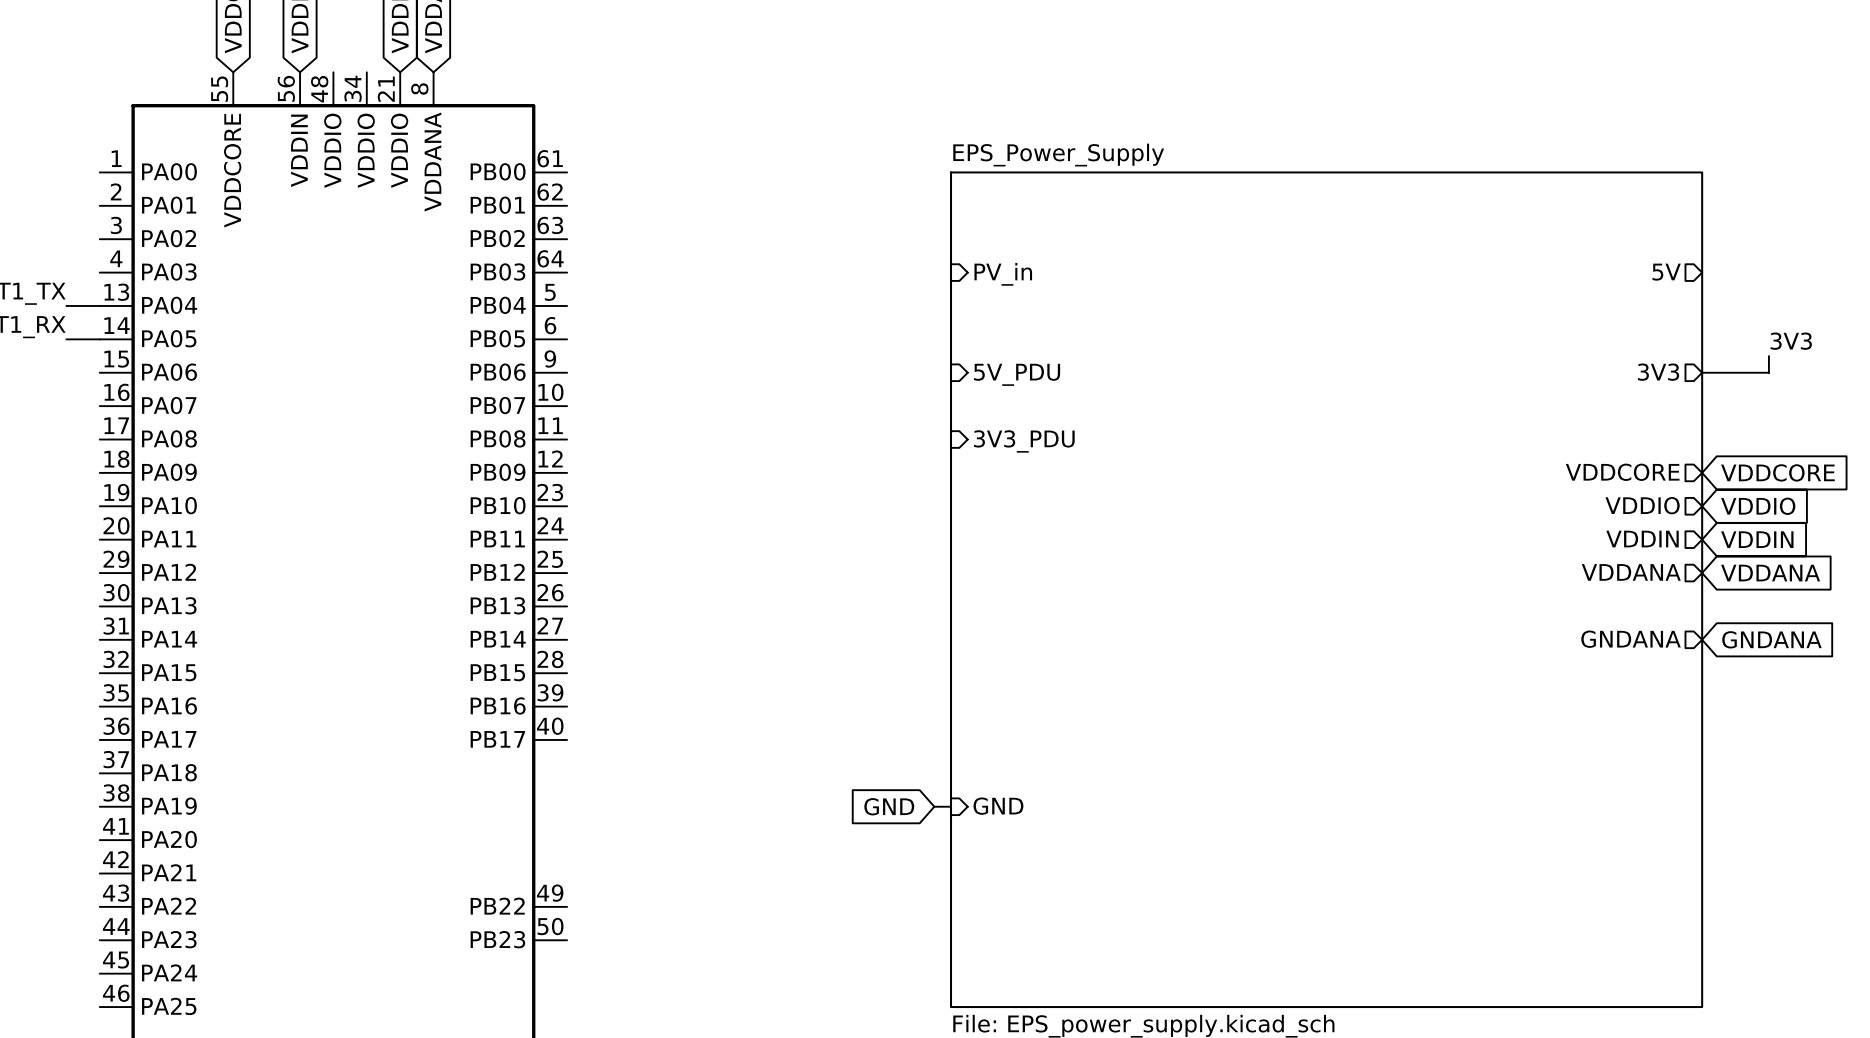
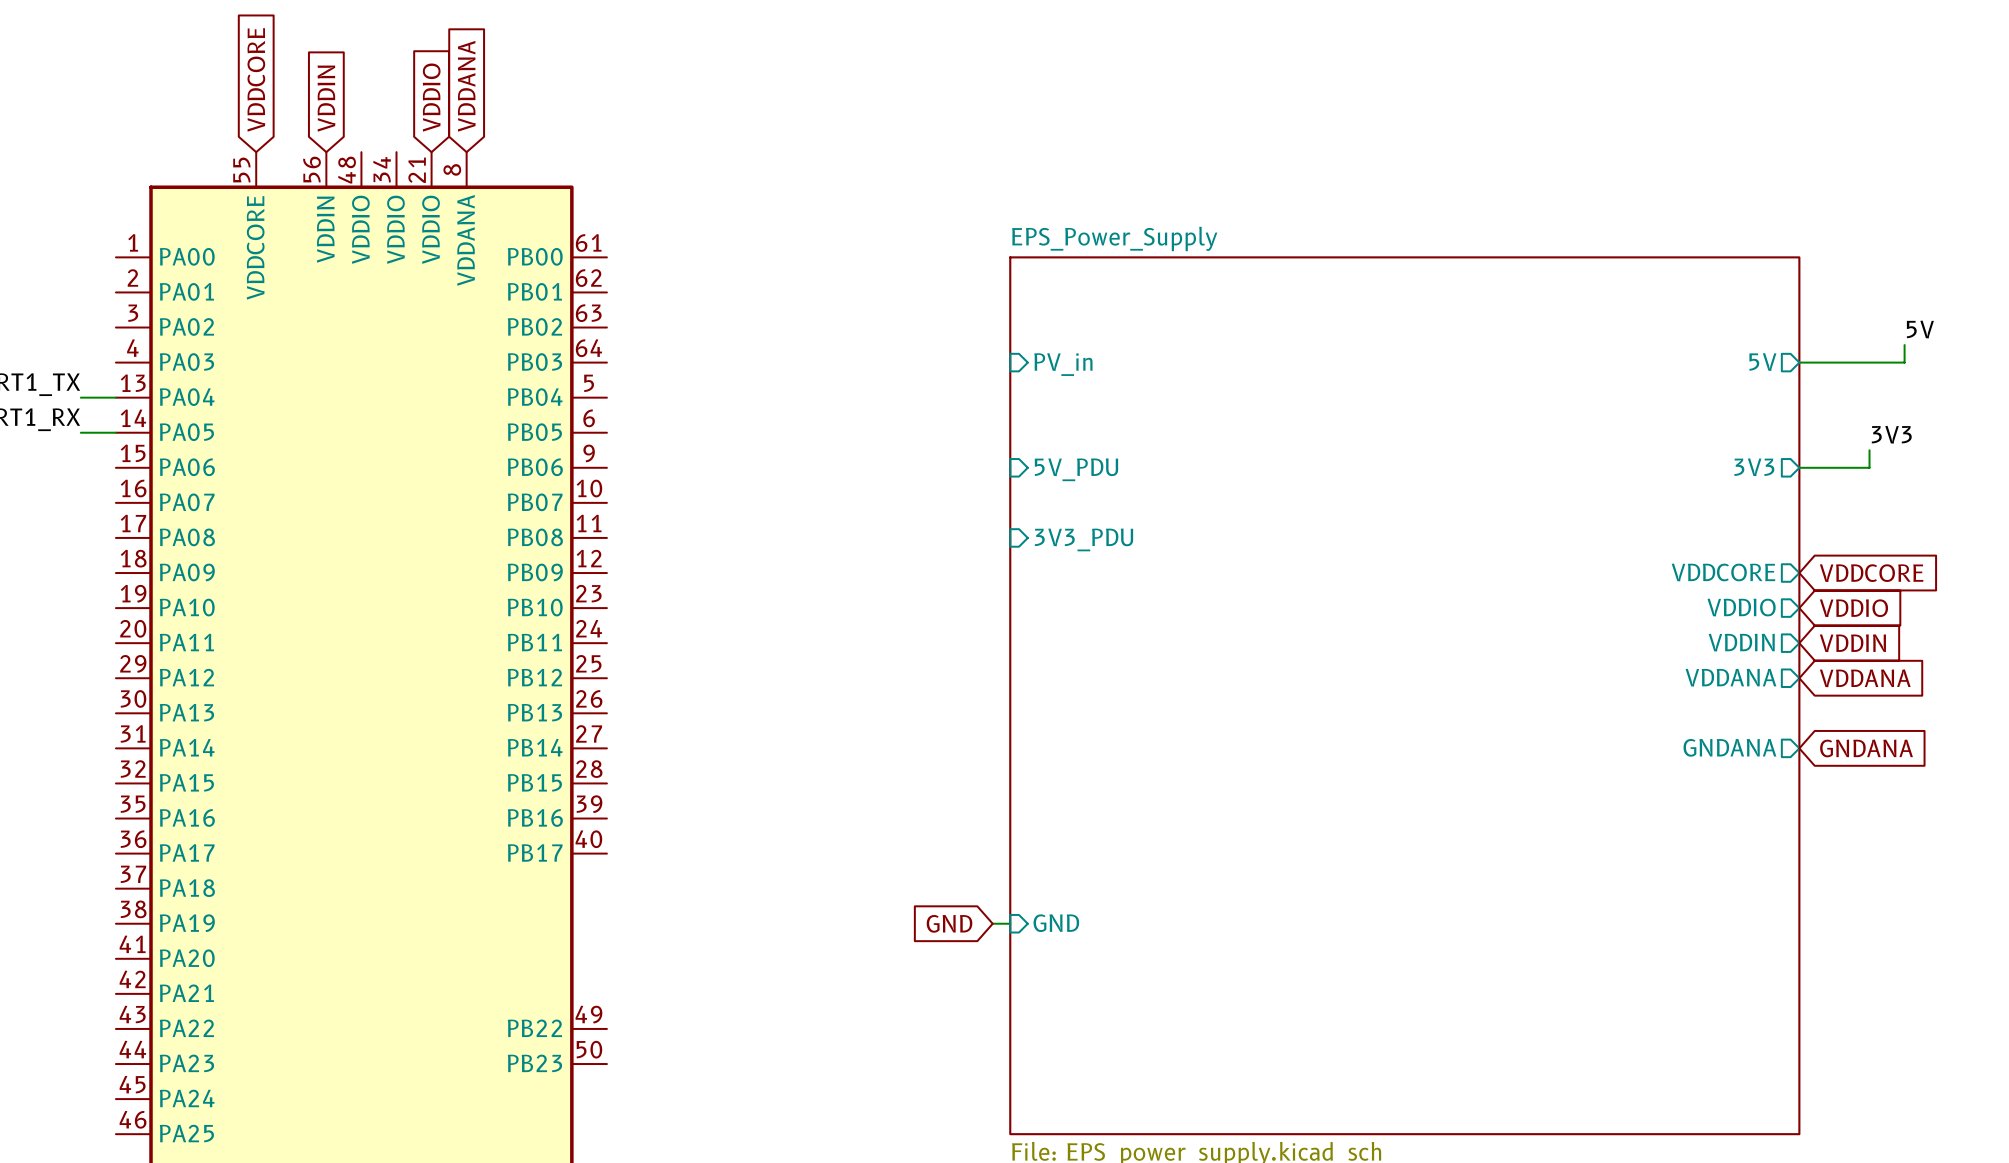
label: none -> 5V (1920, 329)
wire: none -> (1904, 345) (1904, 362) (1799, 362)

